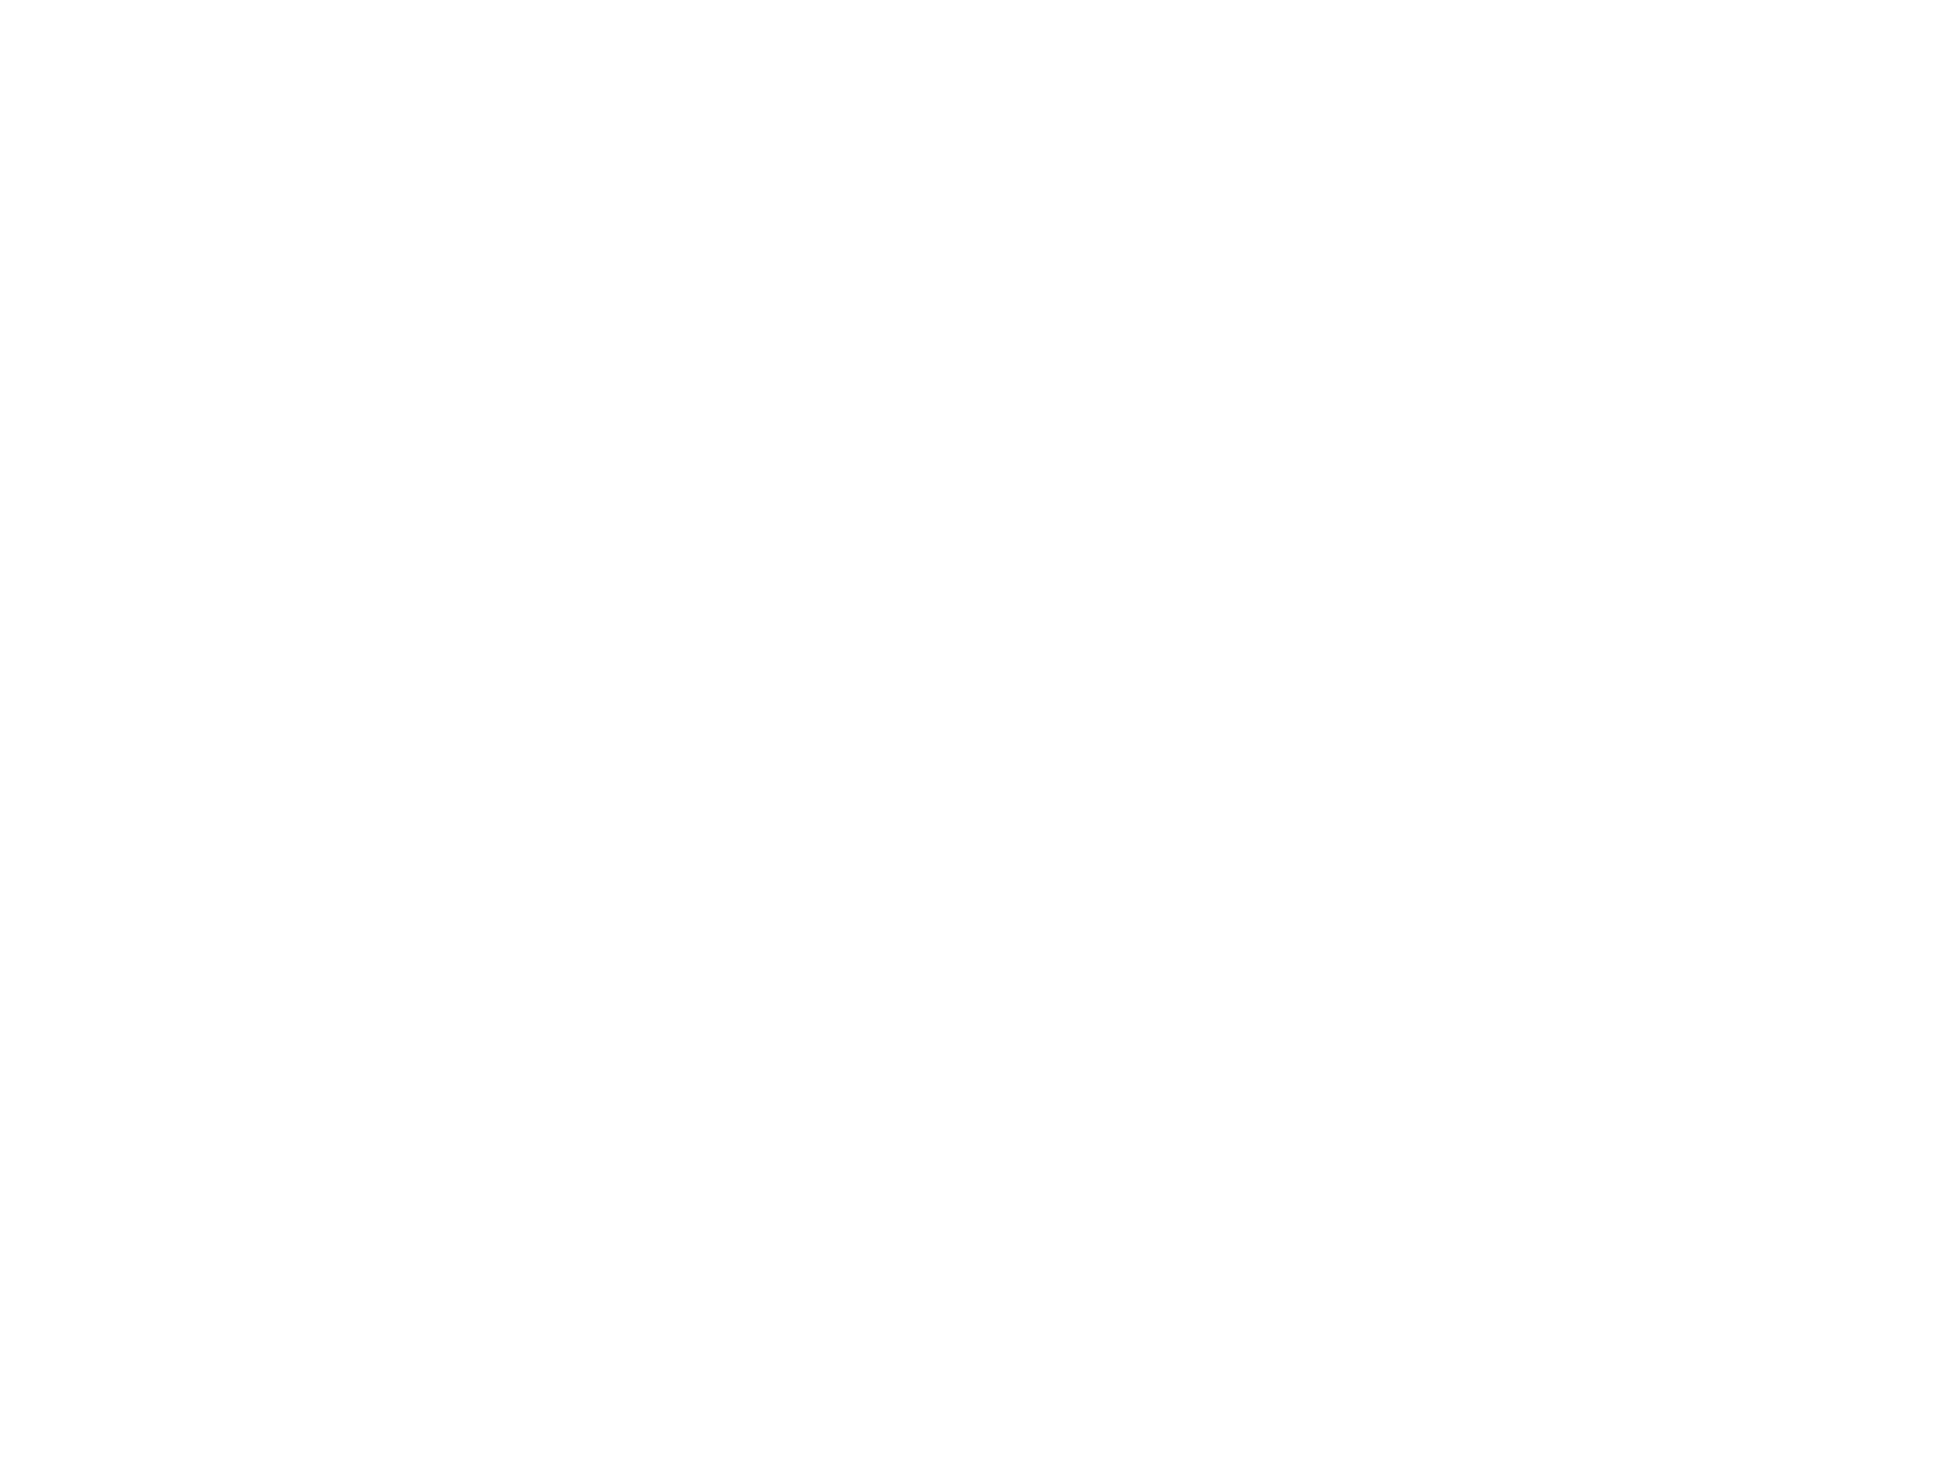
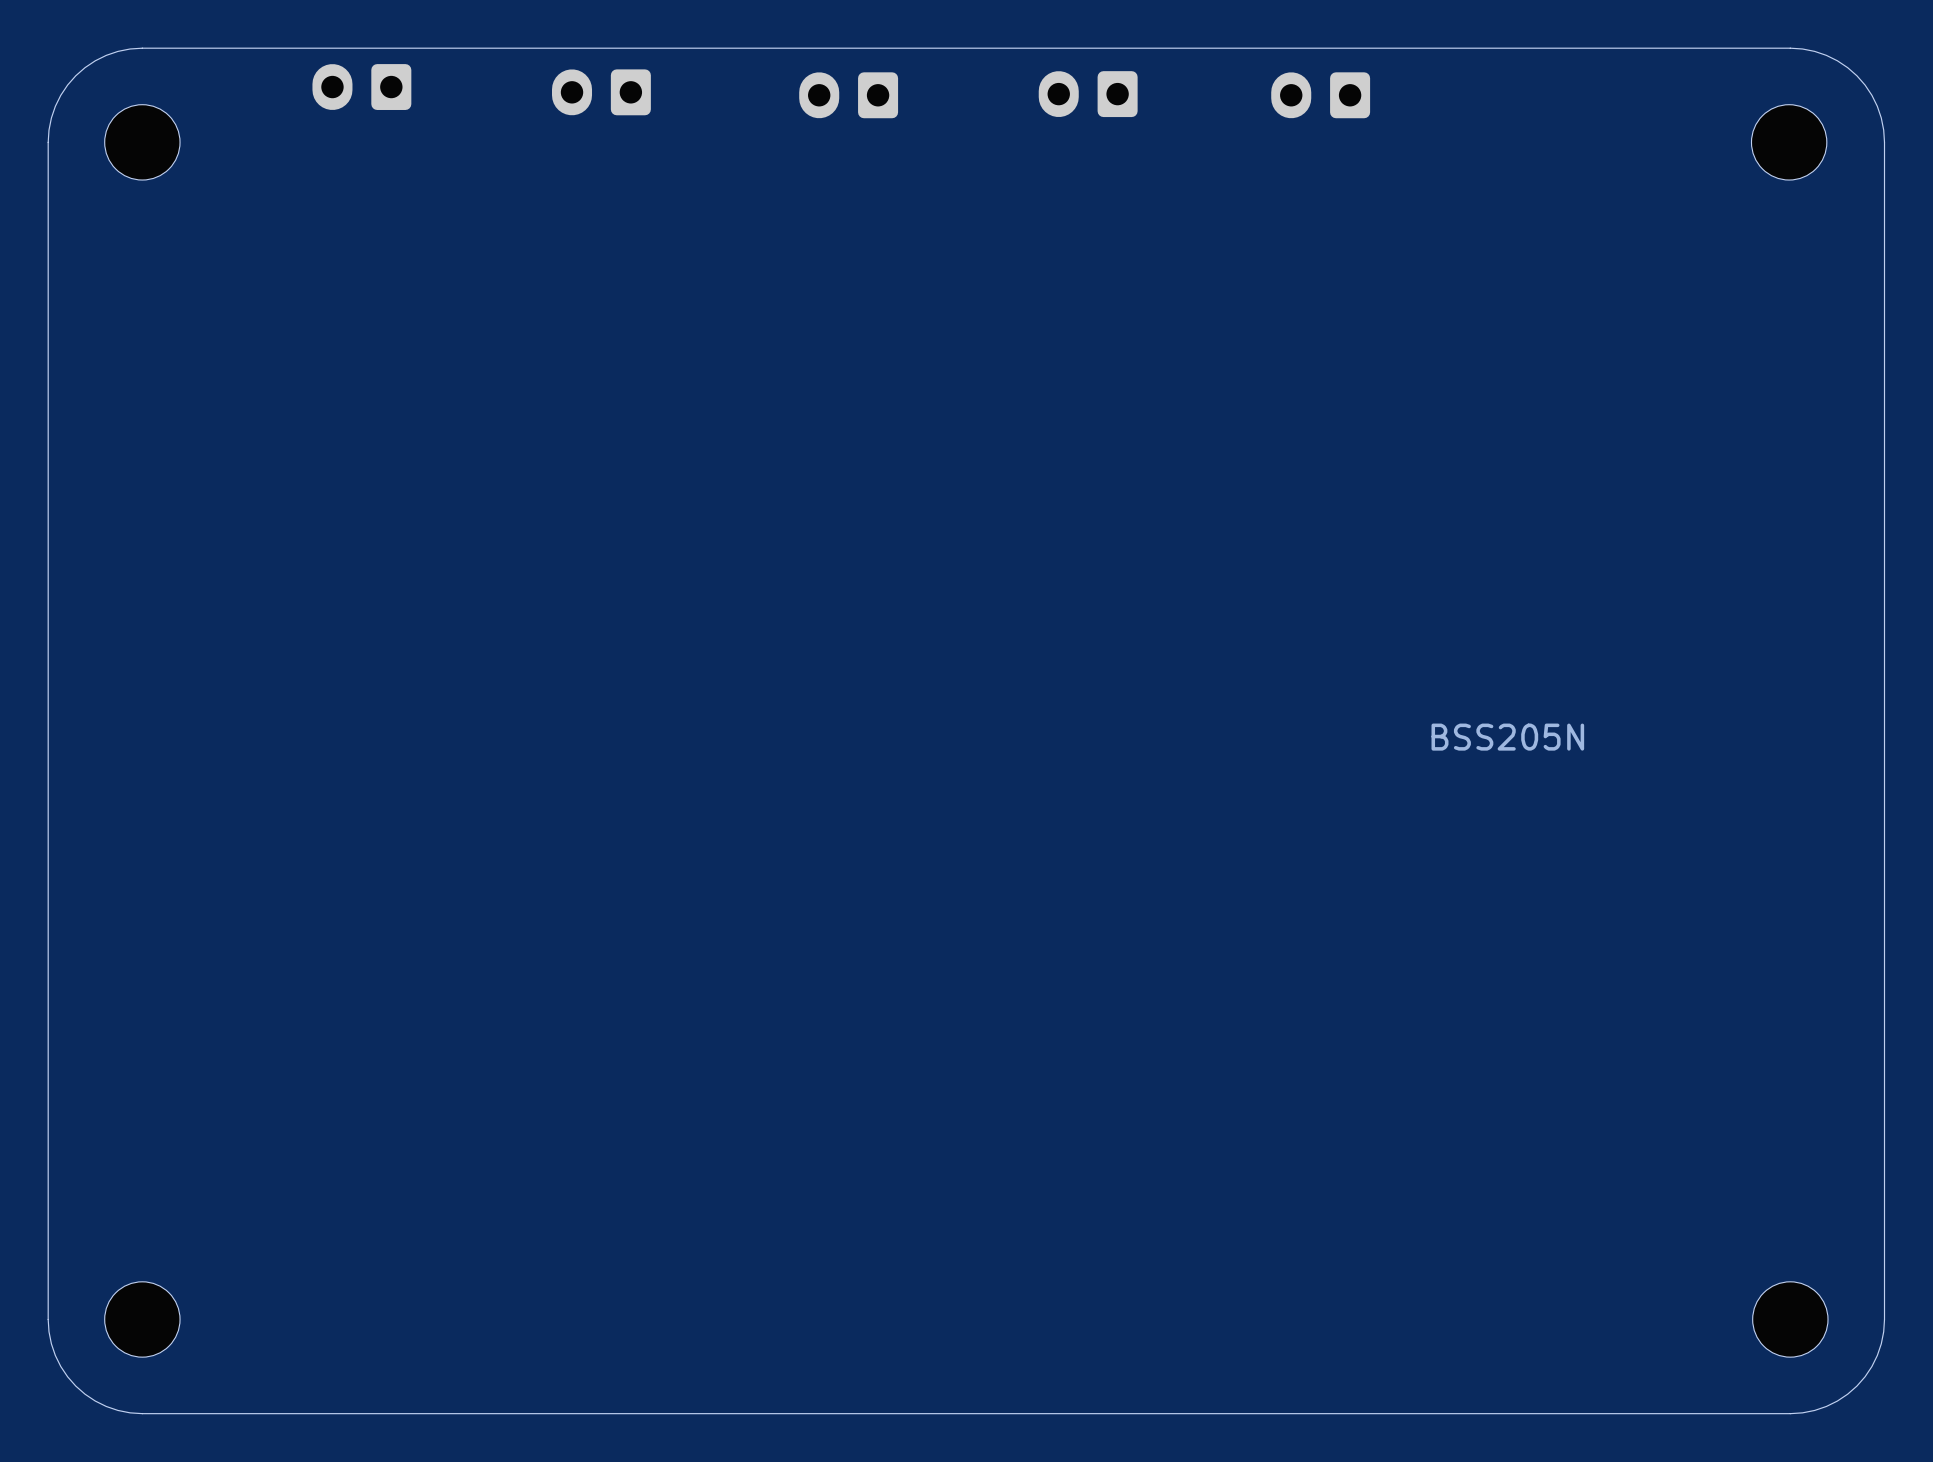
part: none -> (361, 87)
part: none -> (601, 92)
part: none -> (1088, 94)
part: none -> (848, 95)
part: none -> (1320, 95)
part: none -> (966, 730)
part: none -> BSS205N (1507, 737)

